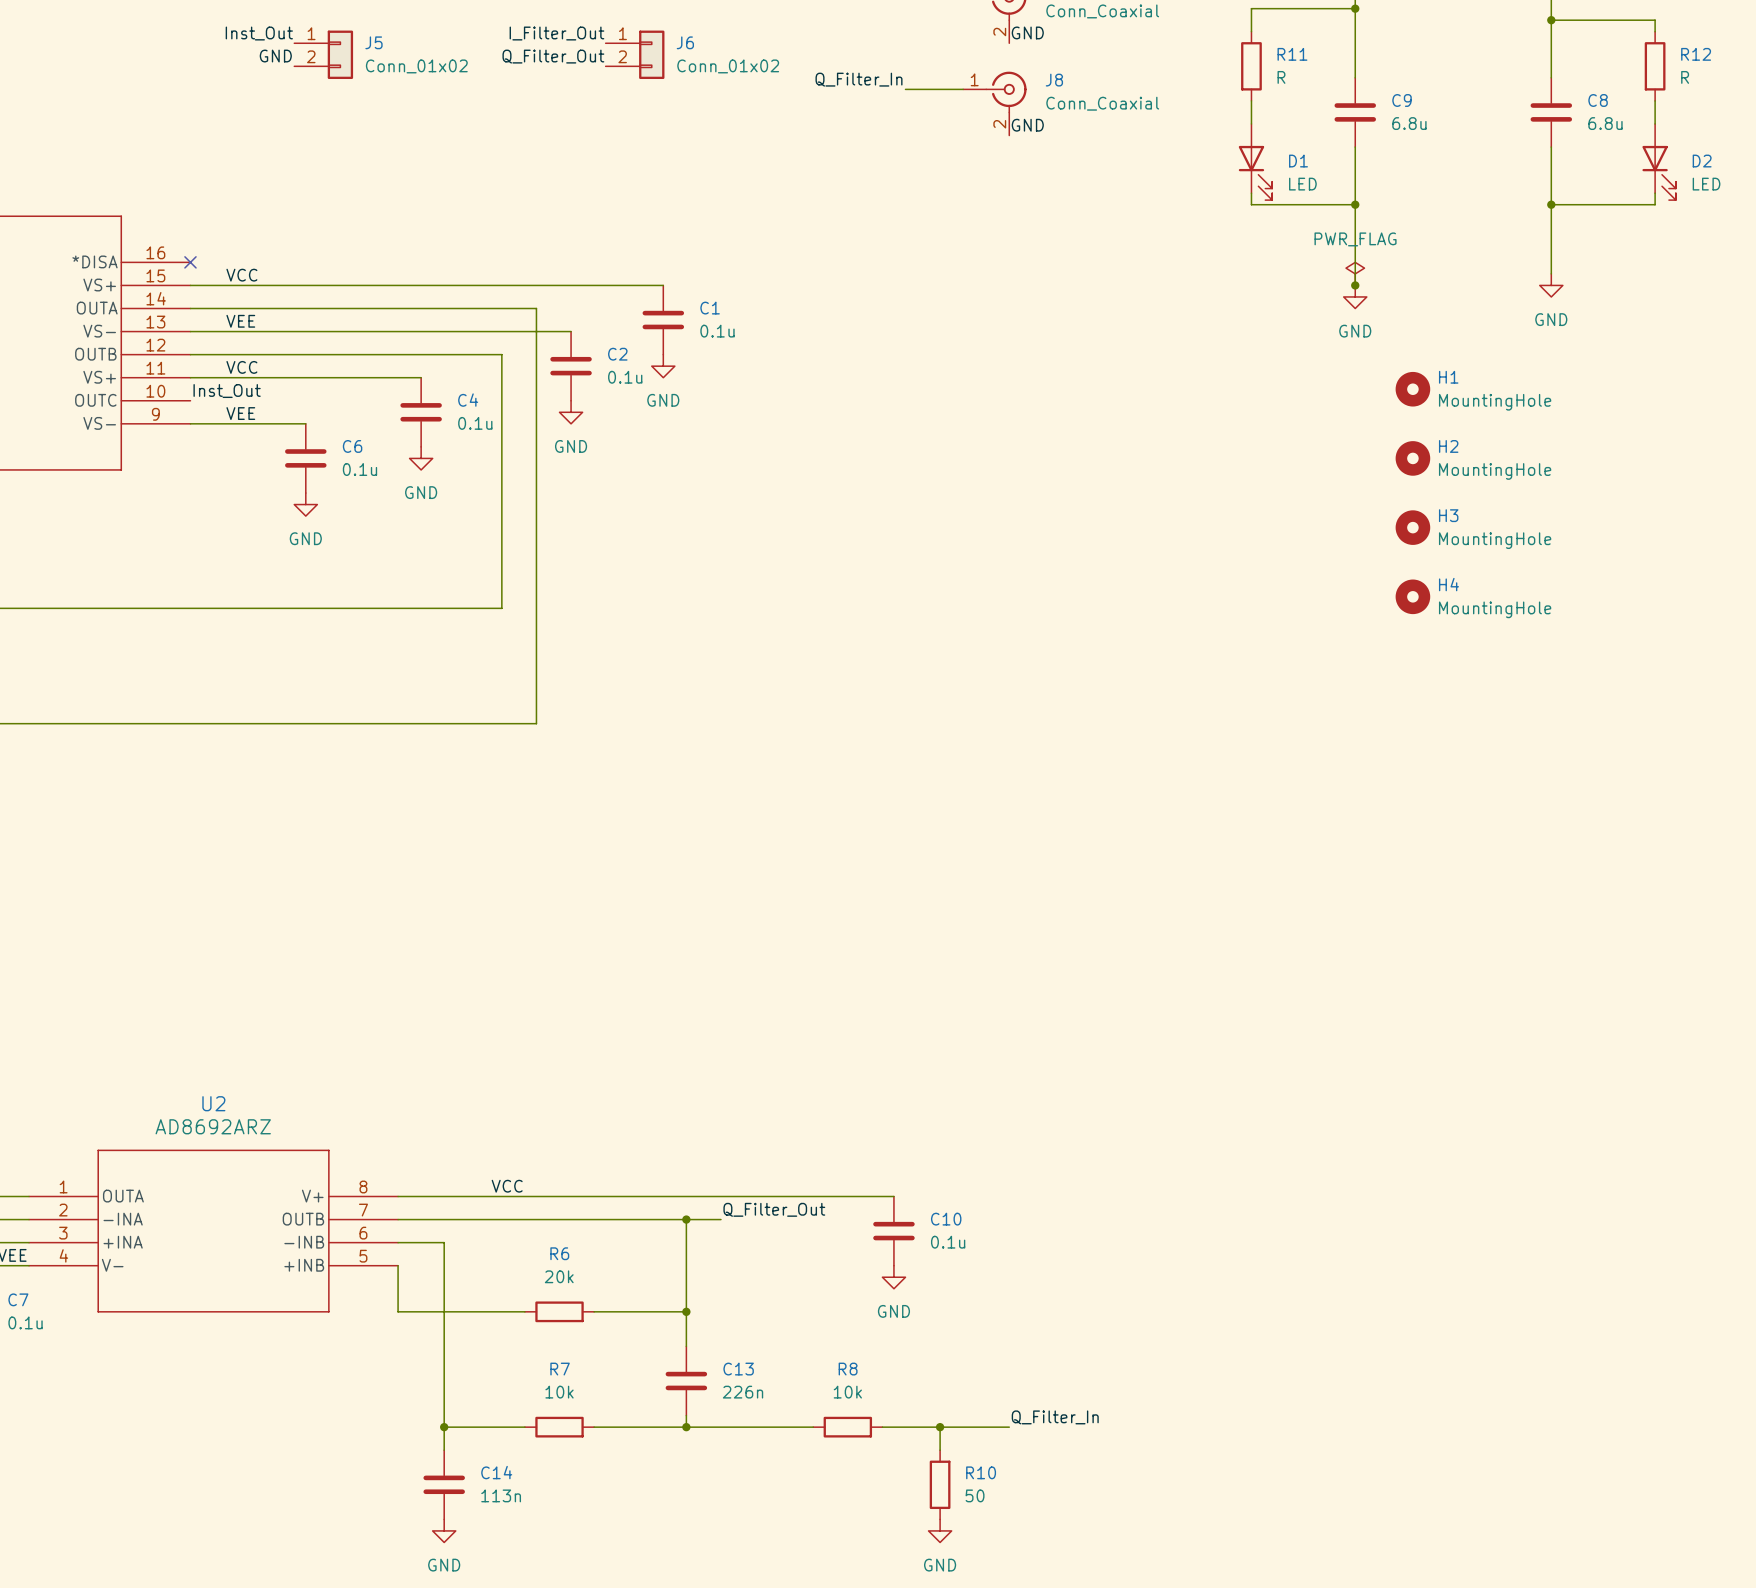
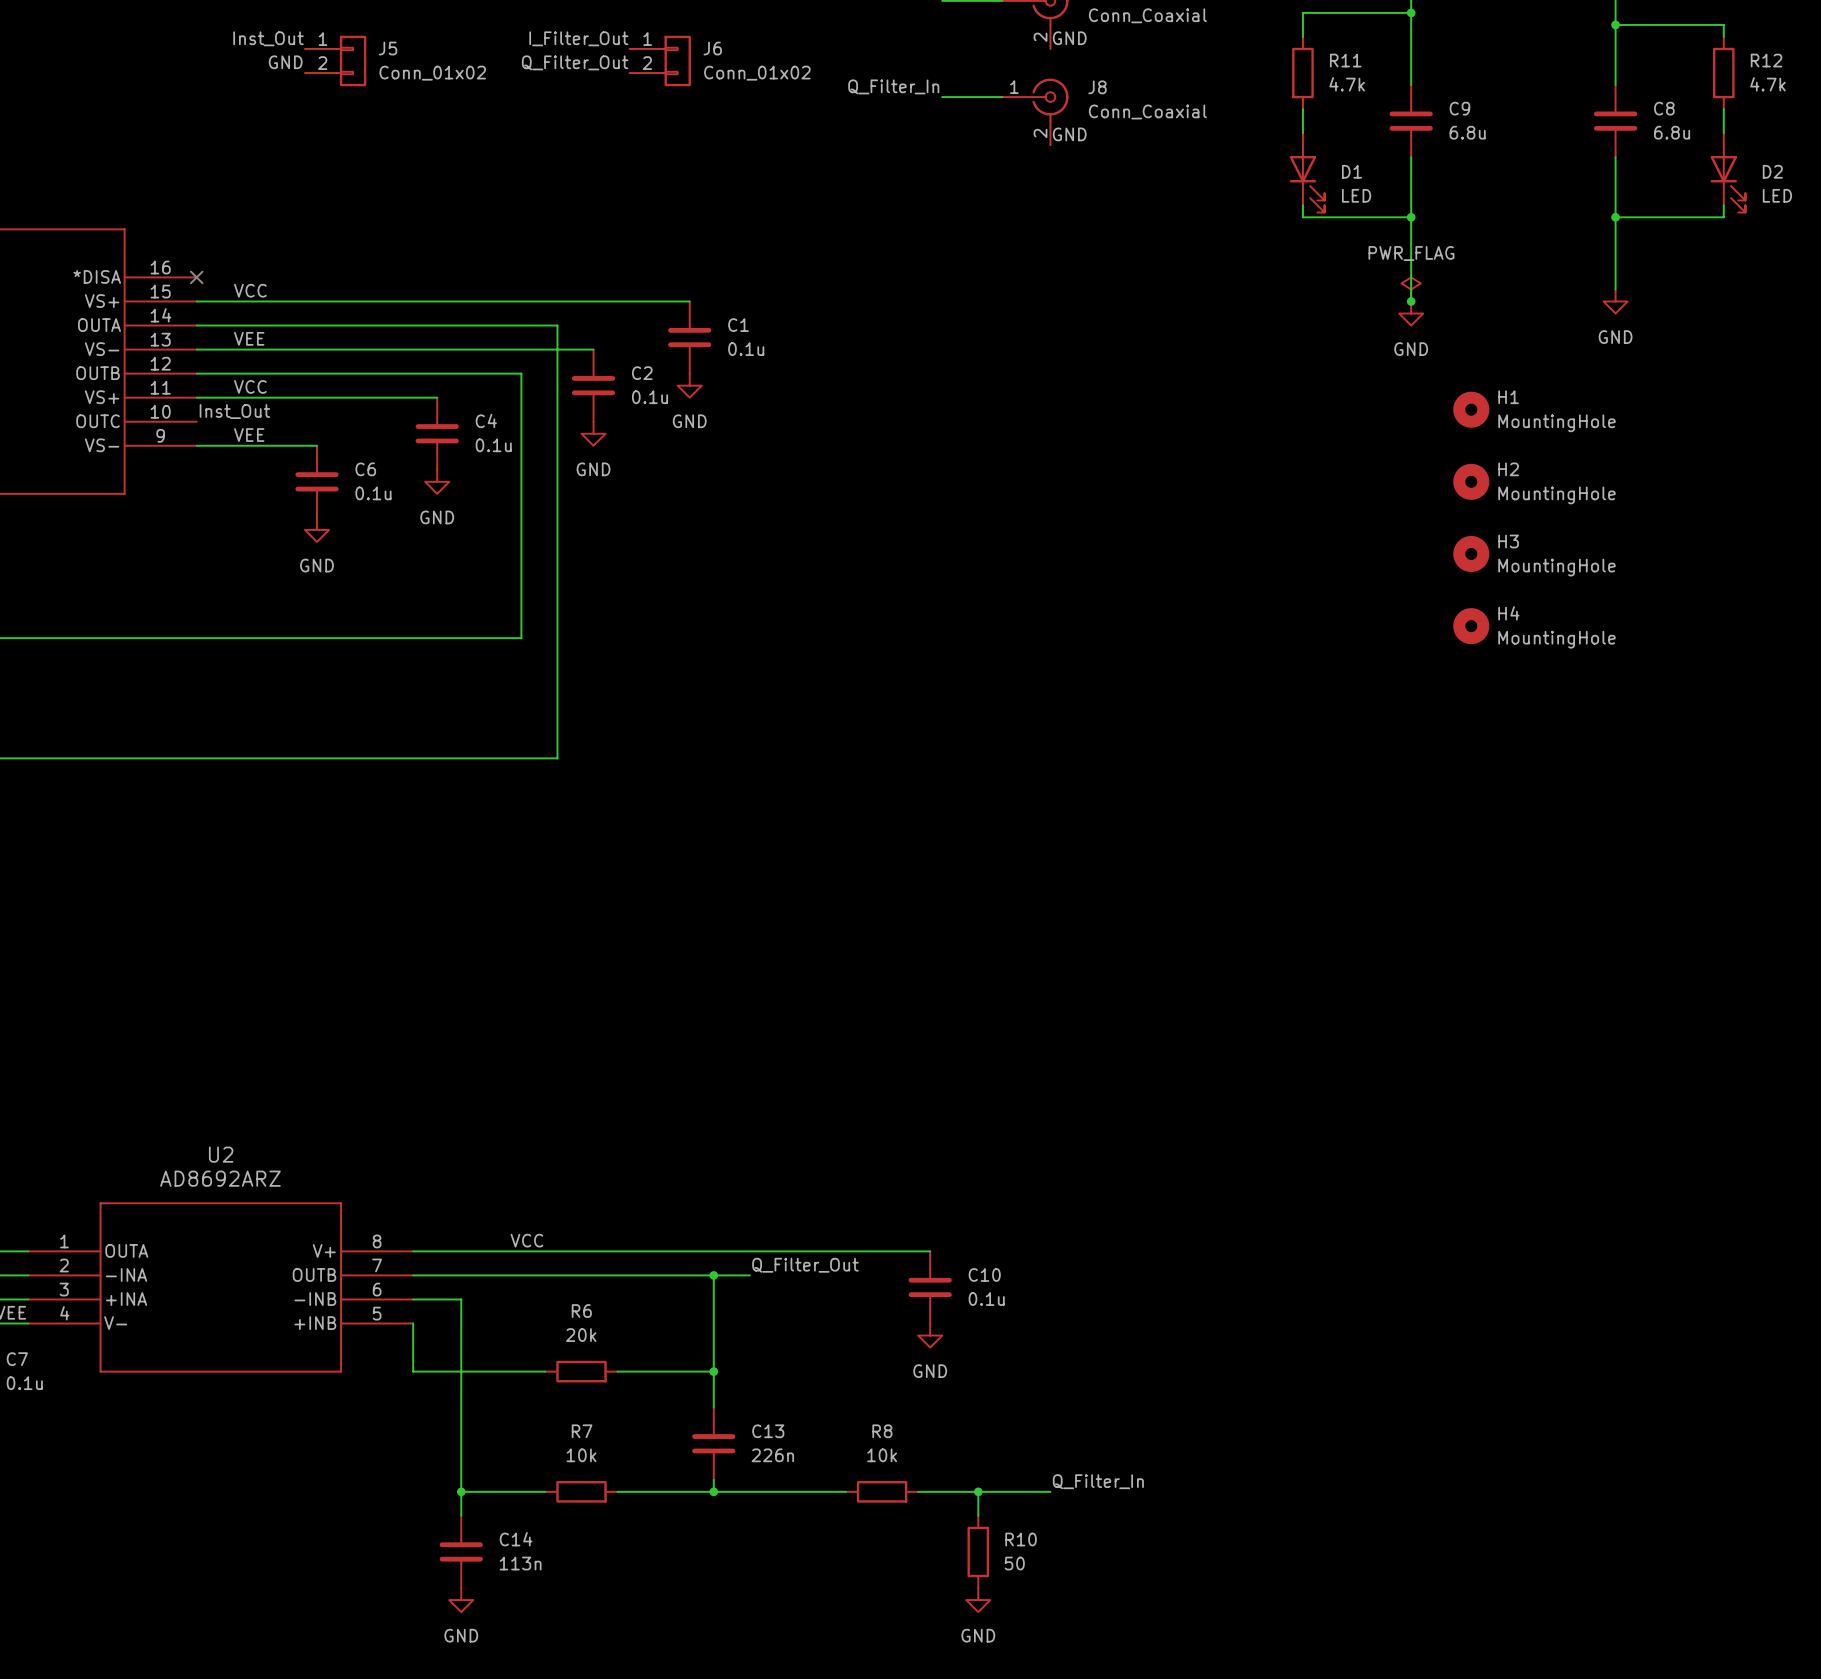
R11 value: R (1281, 77) -> 4.7k (1347, 84)
R12 value: R (1685, 77) -> 4.7k (1767, 84)

